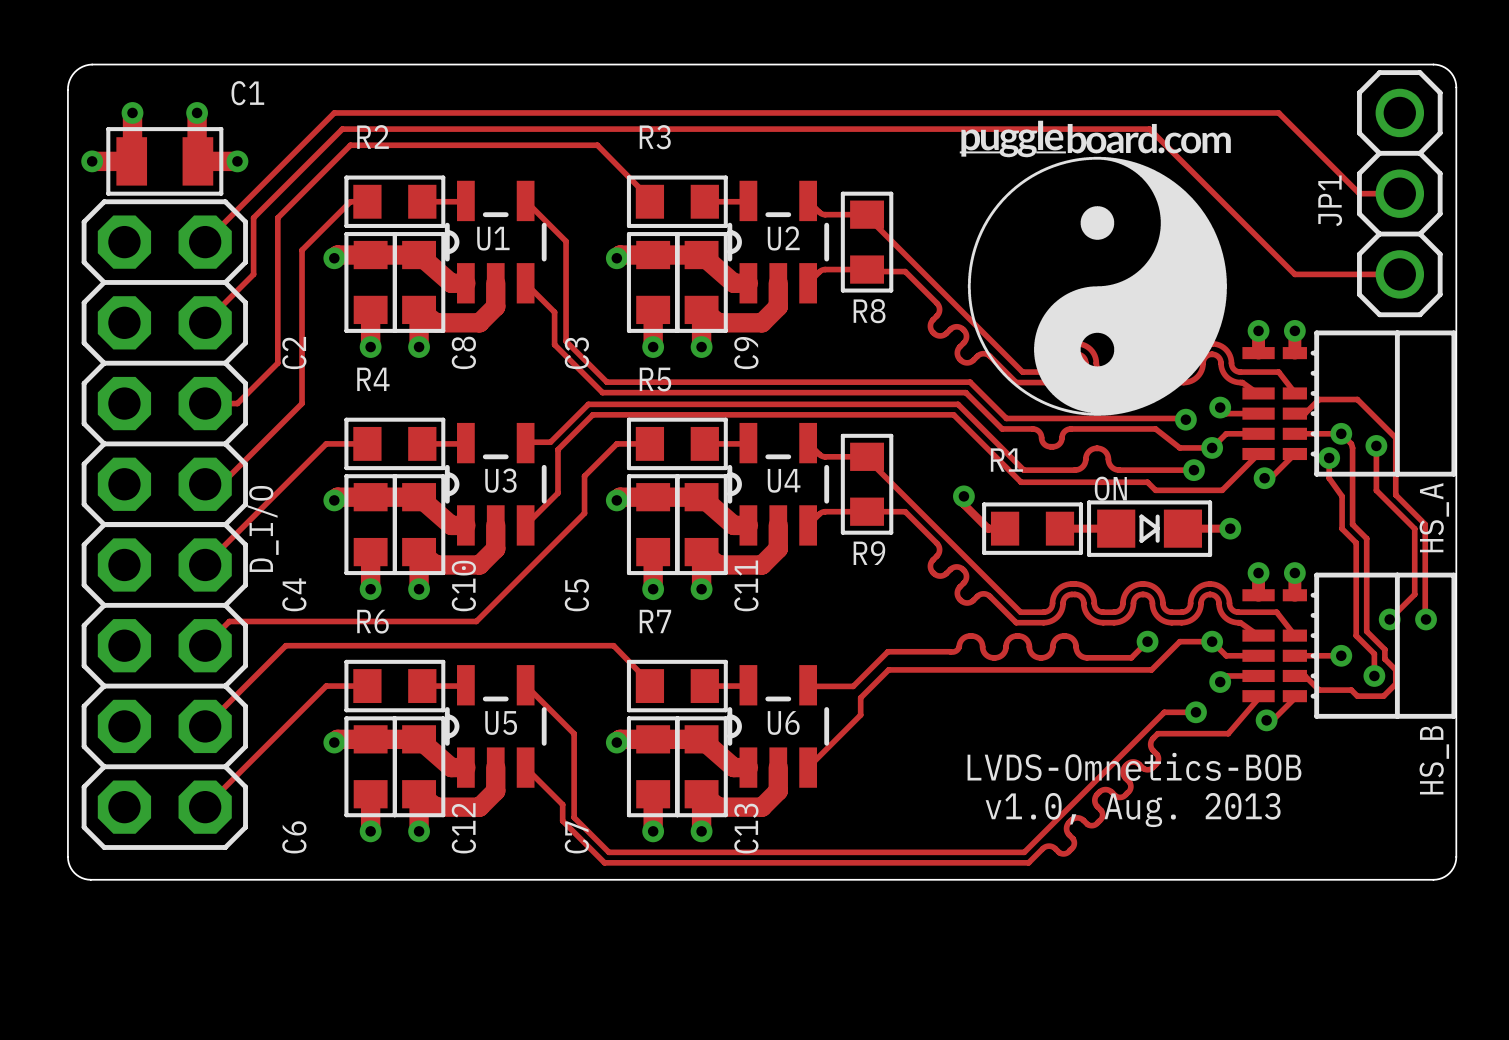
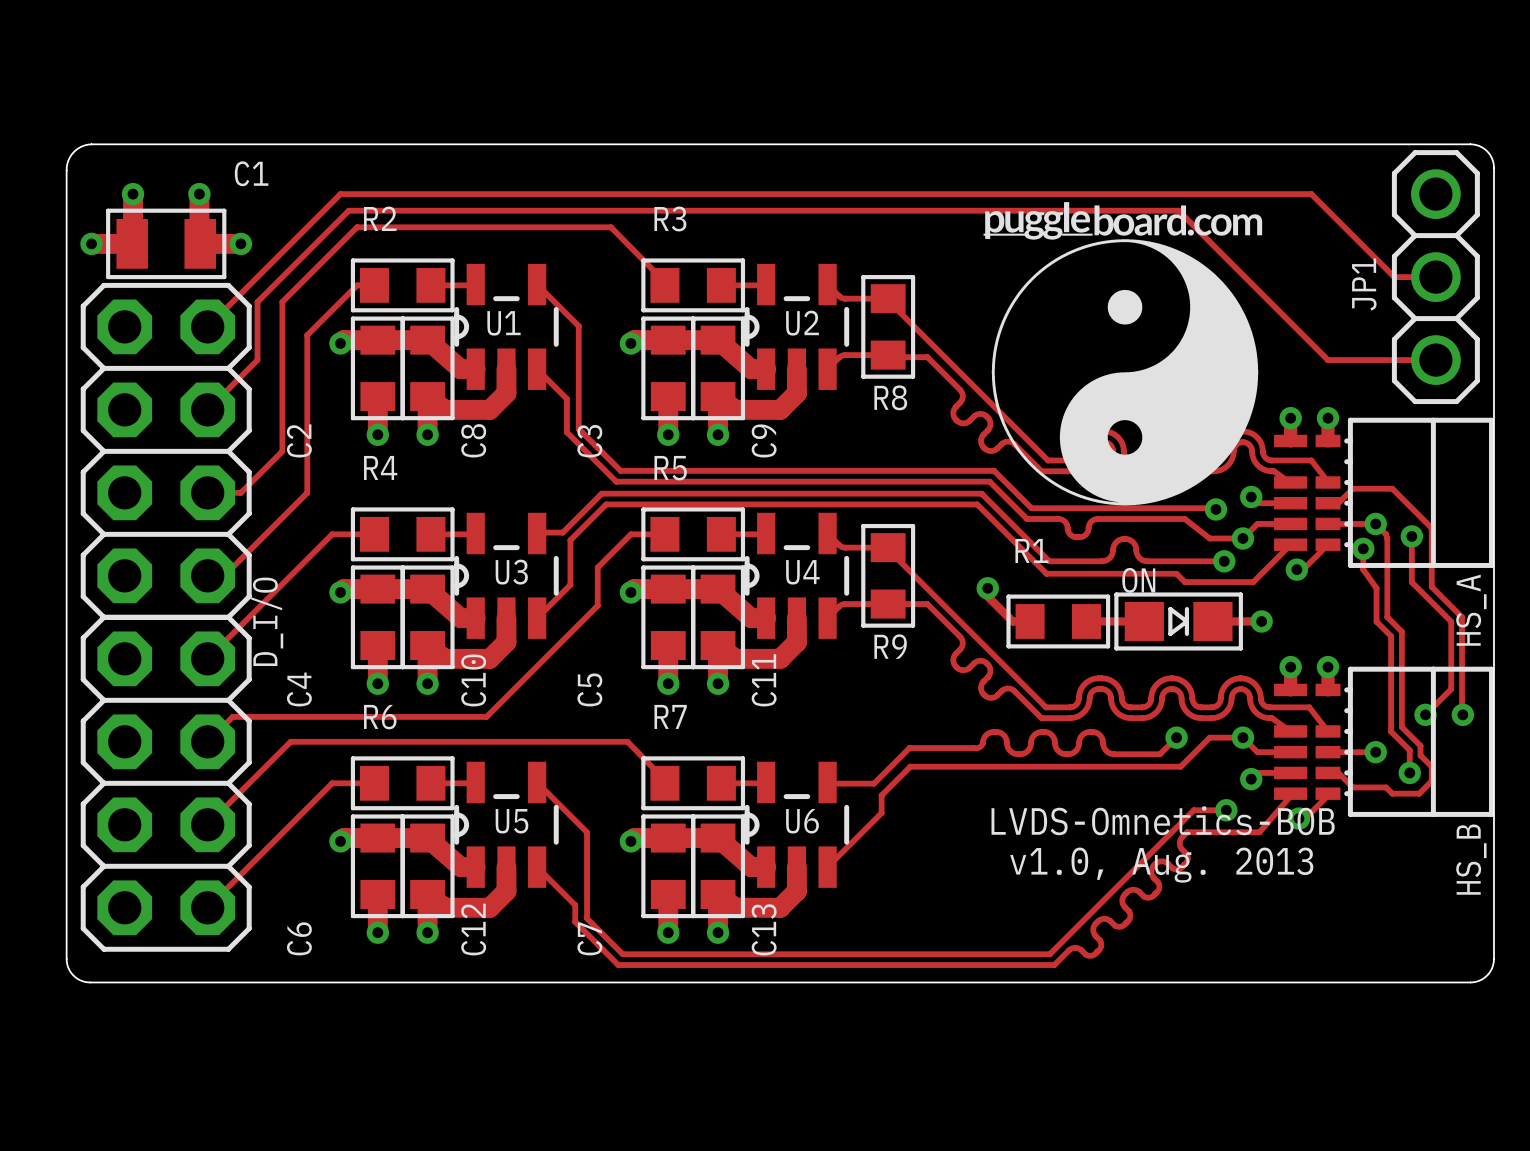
text: none -> LVDS-Omnetics-BOB (1163, 820)
text: LVDS-Omnetics-BOB (1134, 766) -> v1.0, Aug. 2013 (1161, 865)
text: v1.0, Aug. 2013 (1133, 810) -> none

